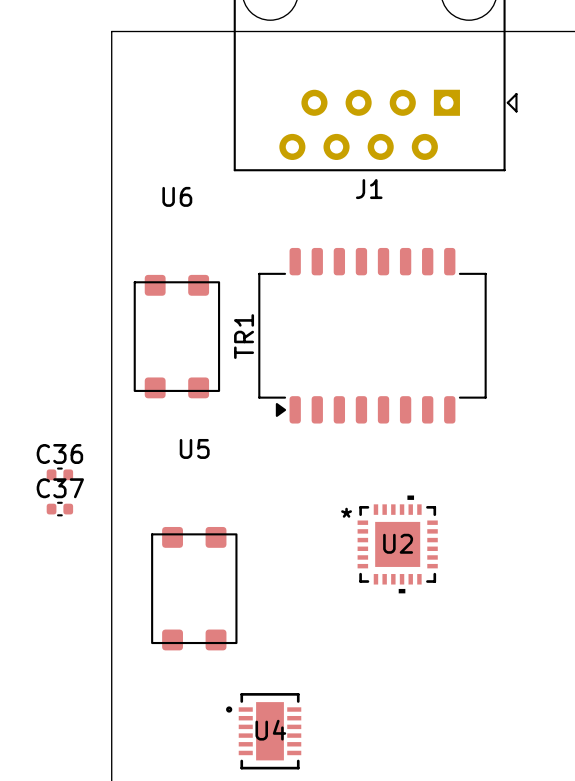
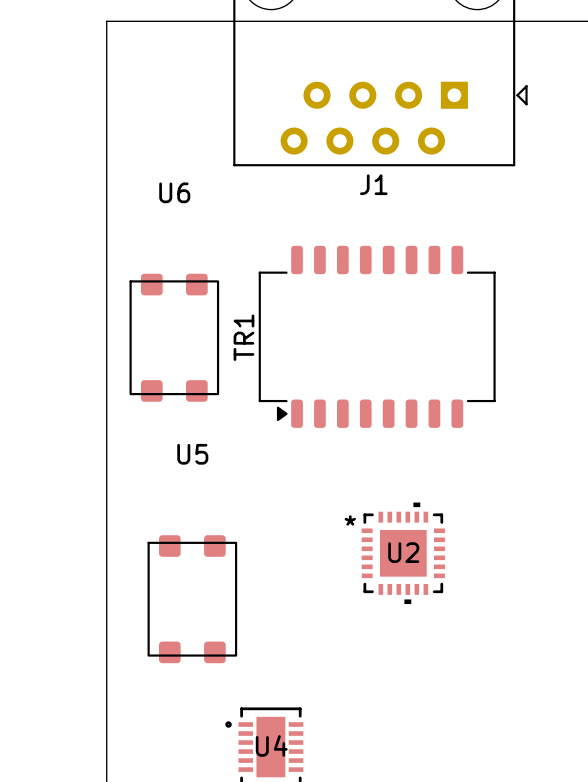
C36: (59, 474) -> none
C37: (59, 509) -> none

